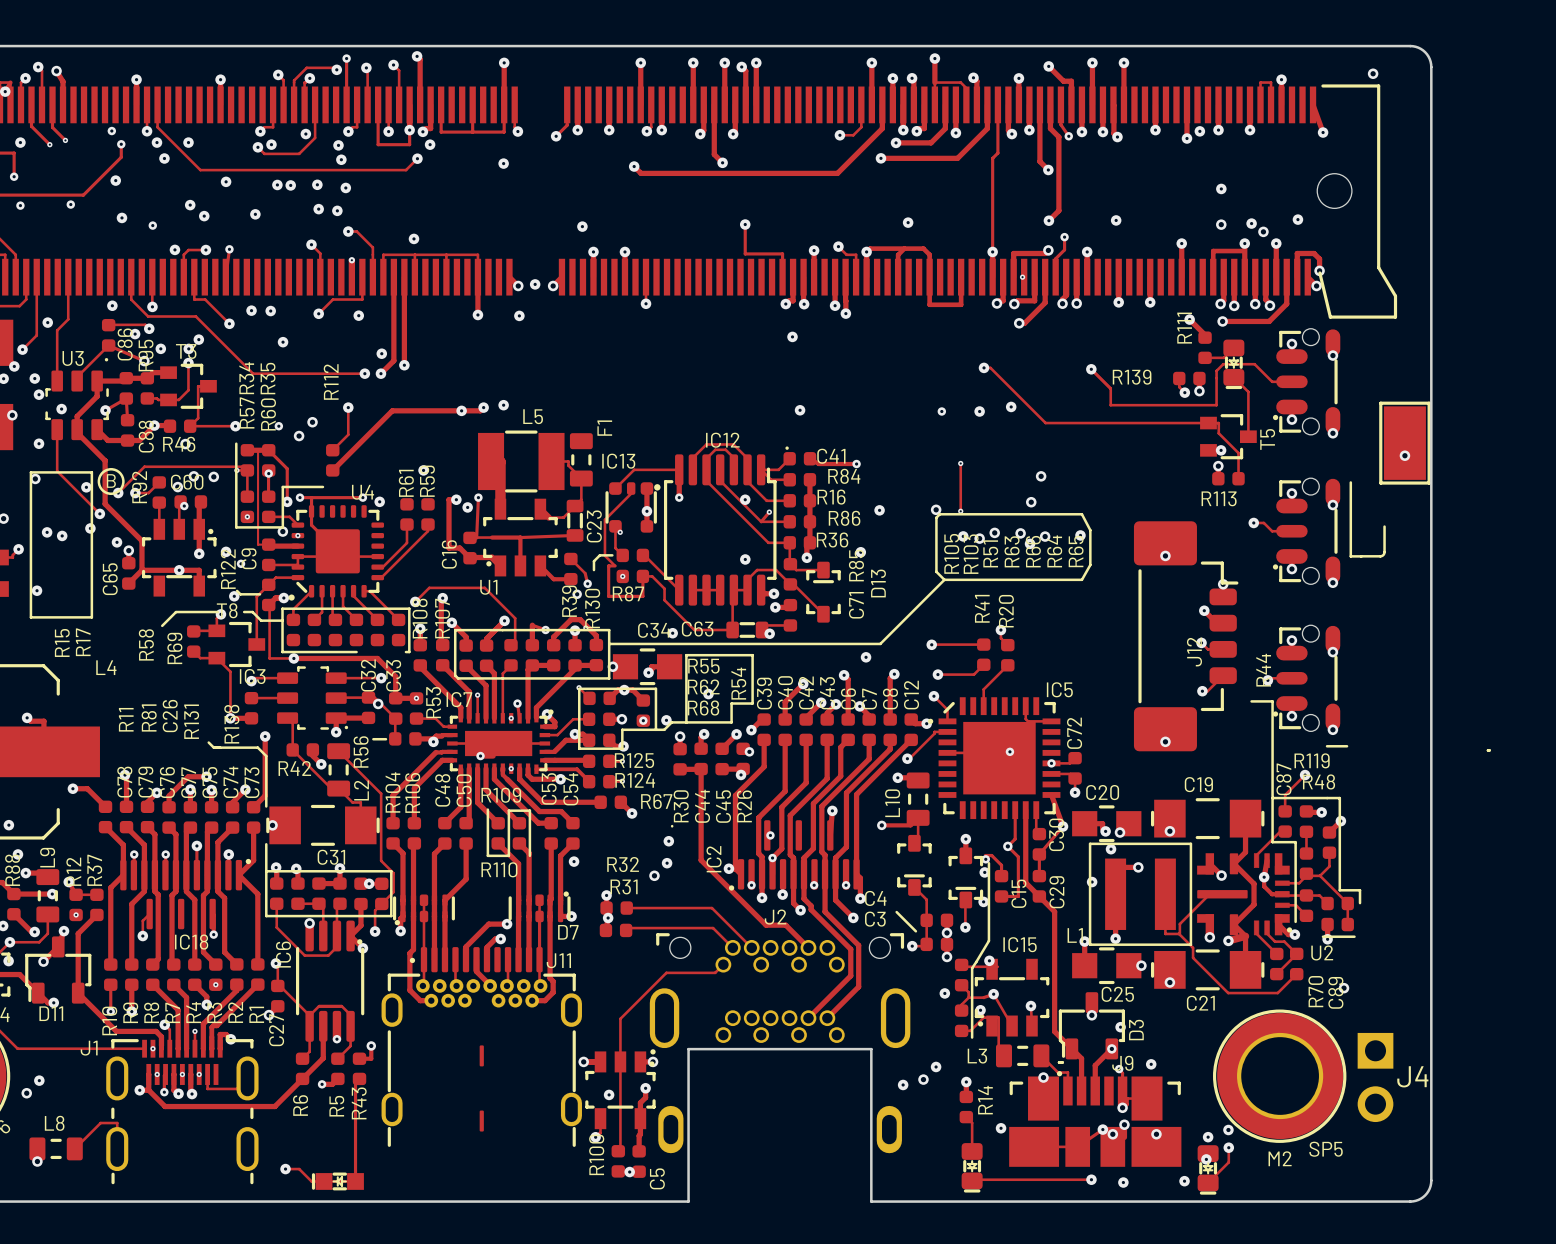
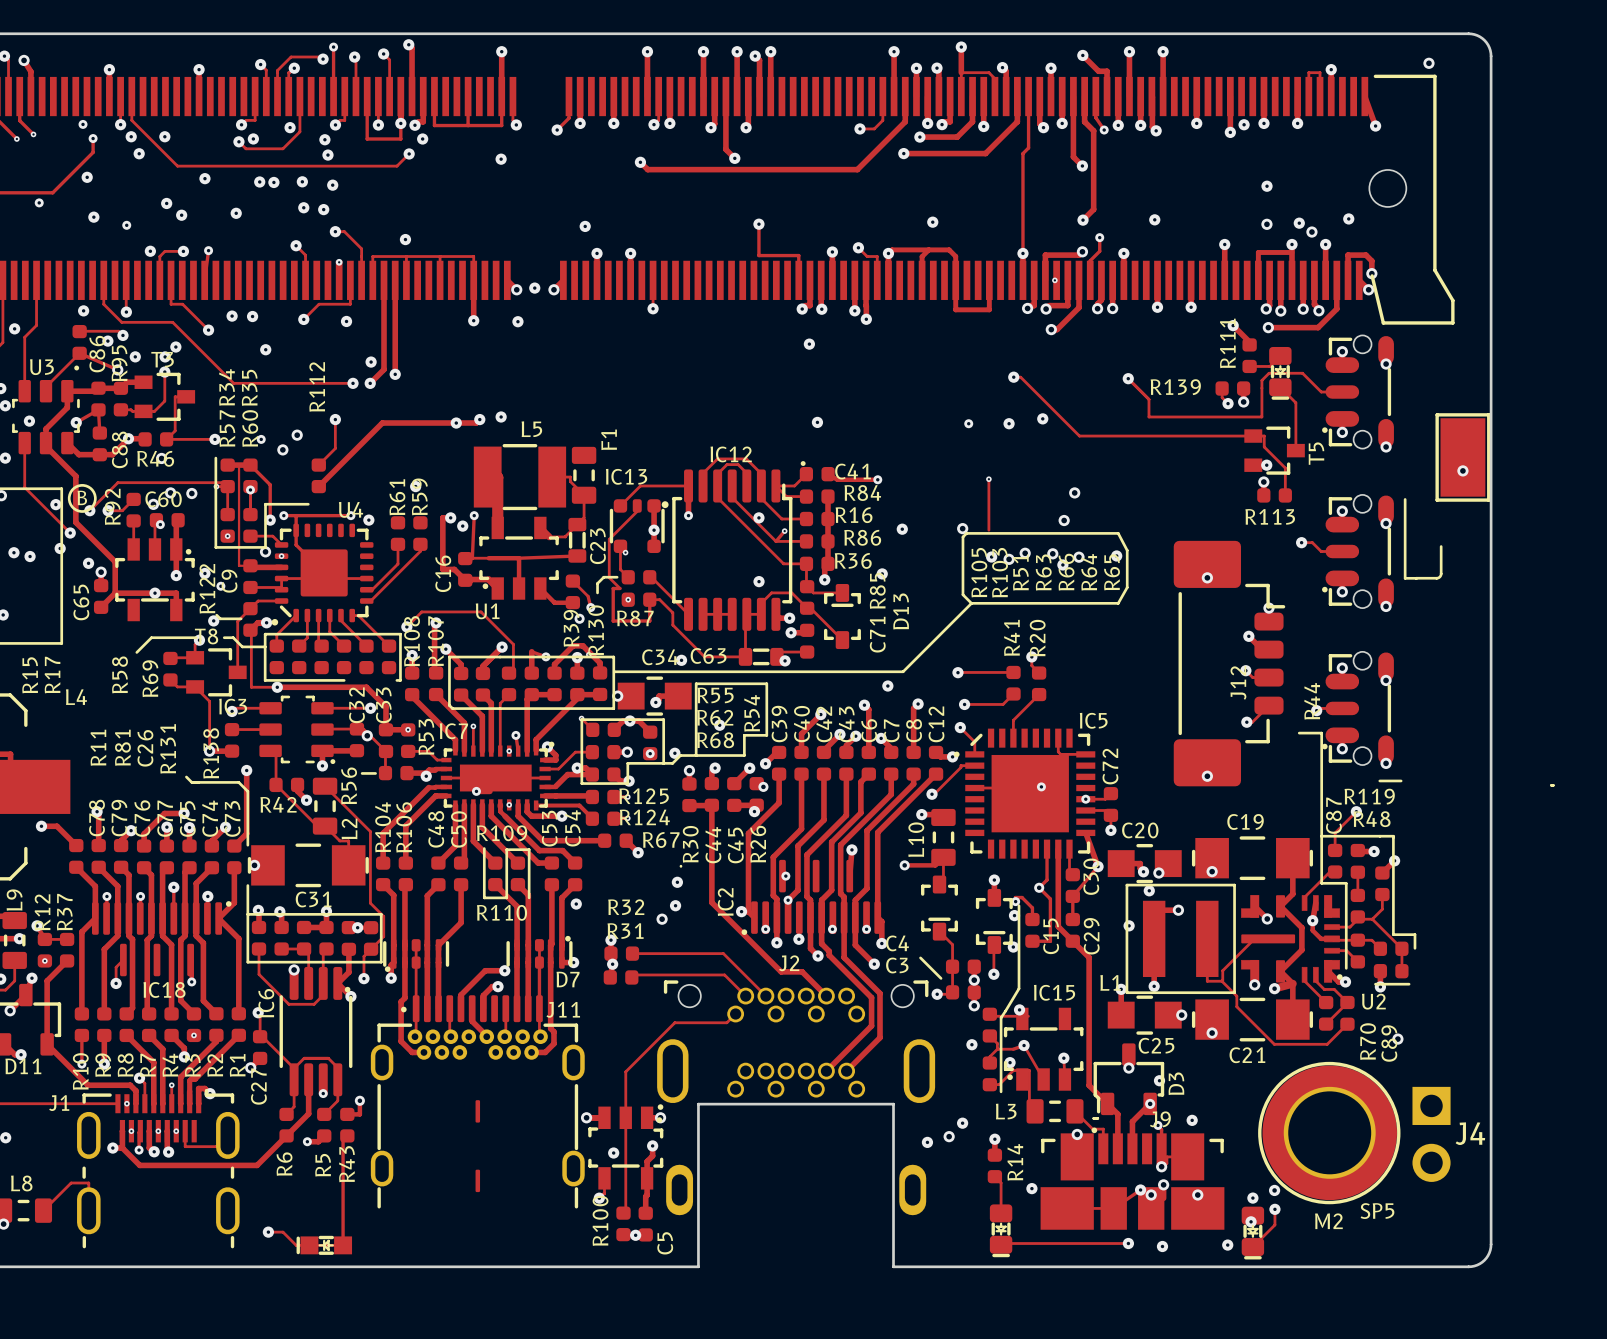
via: (960, 511) -> none

